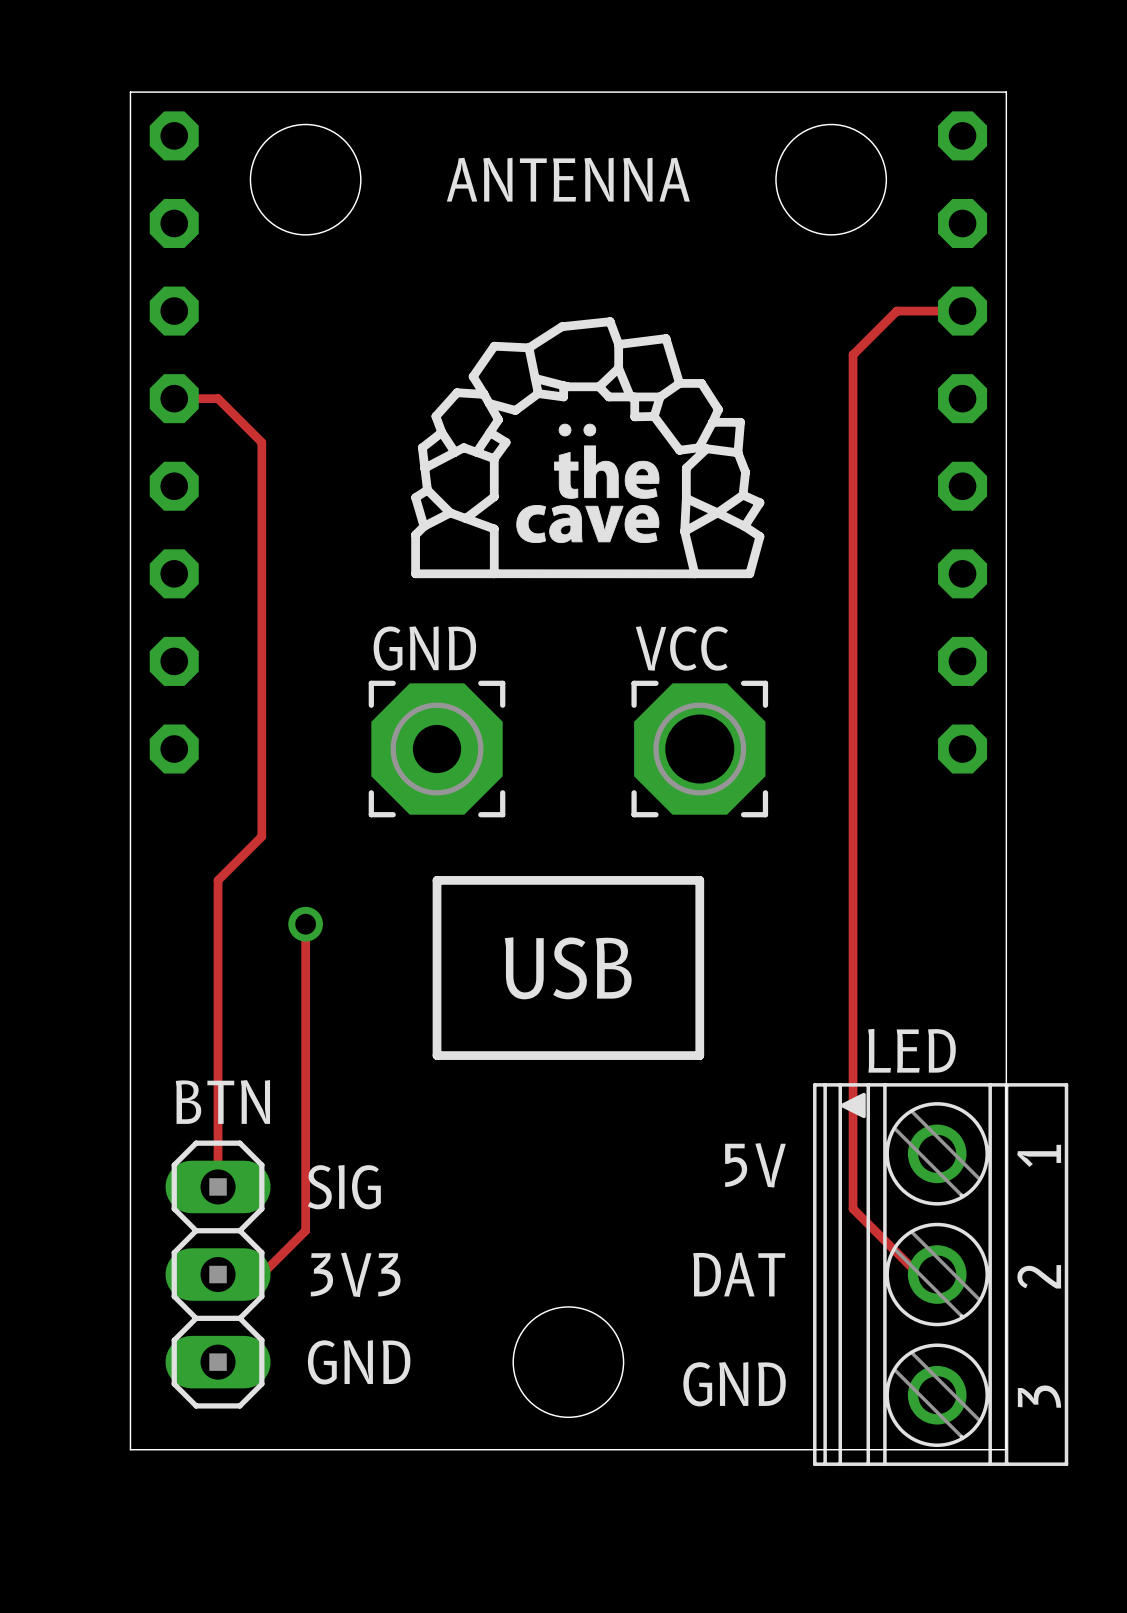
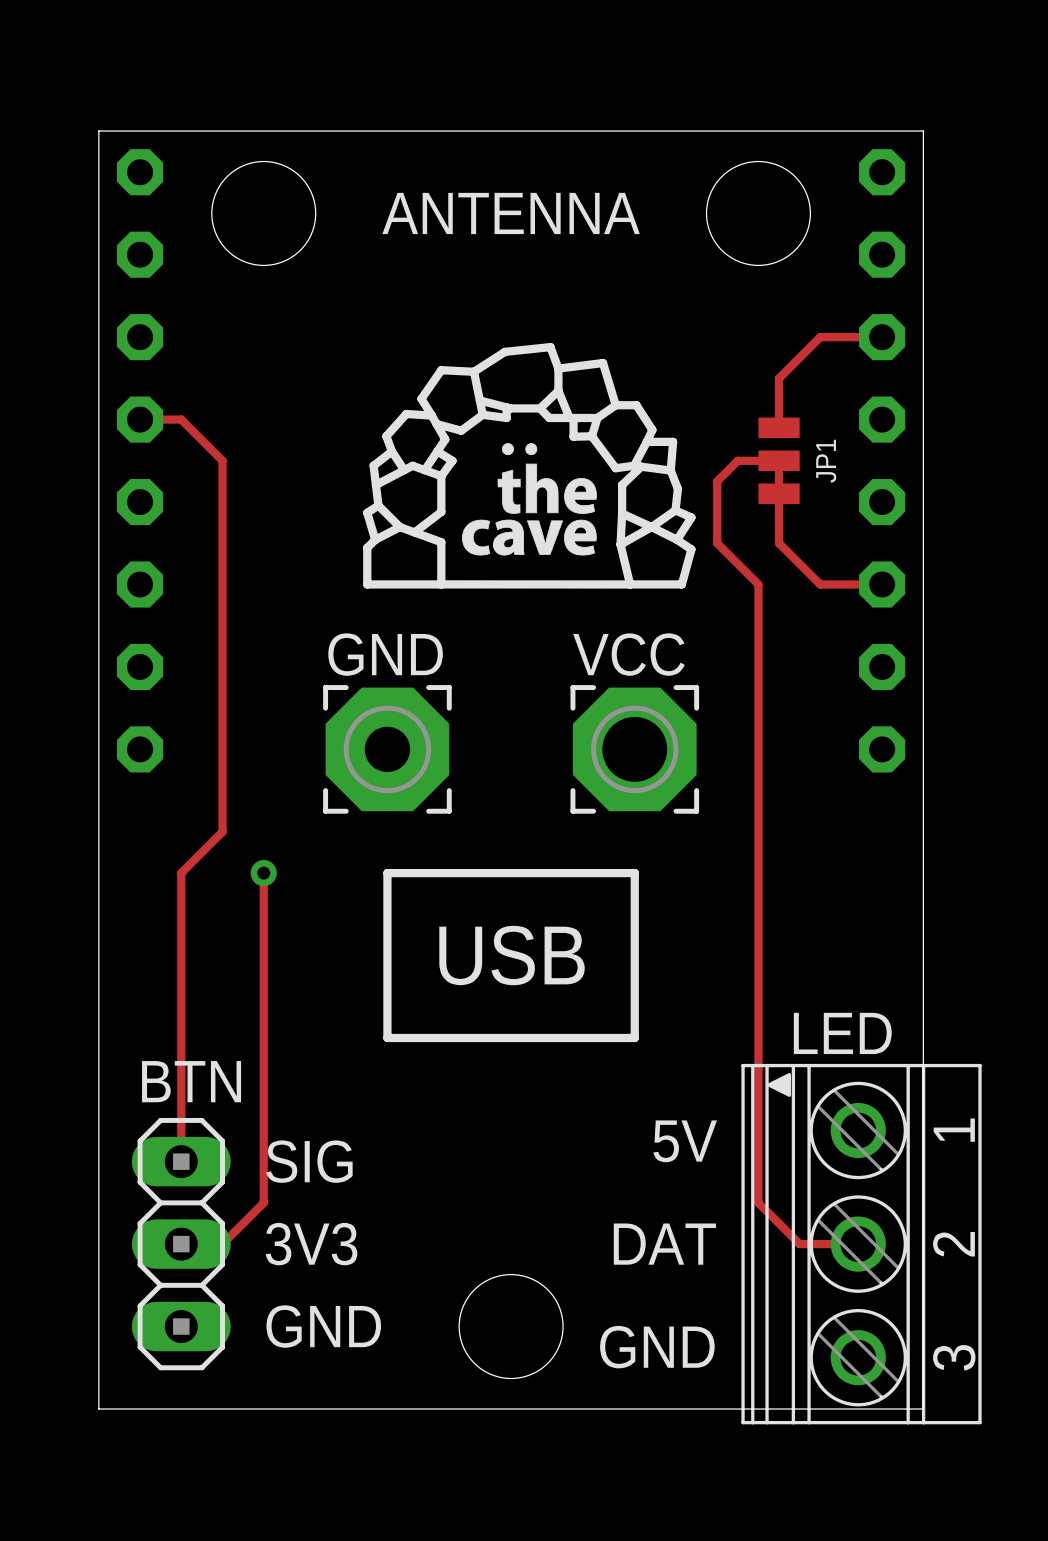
track: (853, 407) (853, 1208) (918, 1274) -> (779, 460) (737, 460) (717, 481) (717, 543) (758, 584) (758, 1202) (799, 1244) (840, 1244)
JP1: none -> (779, 460)
track: none -> (779, 493) (779, 543) (820, 584) (882, 584)
track: none -> (263, 873) (263, 914)
via: none -> (263, 873)
via: (305, 924) -> none

